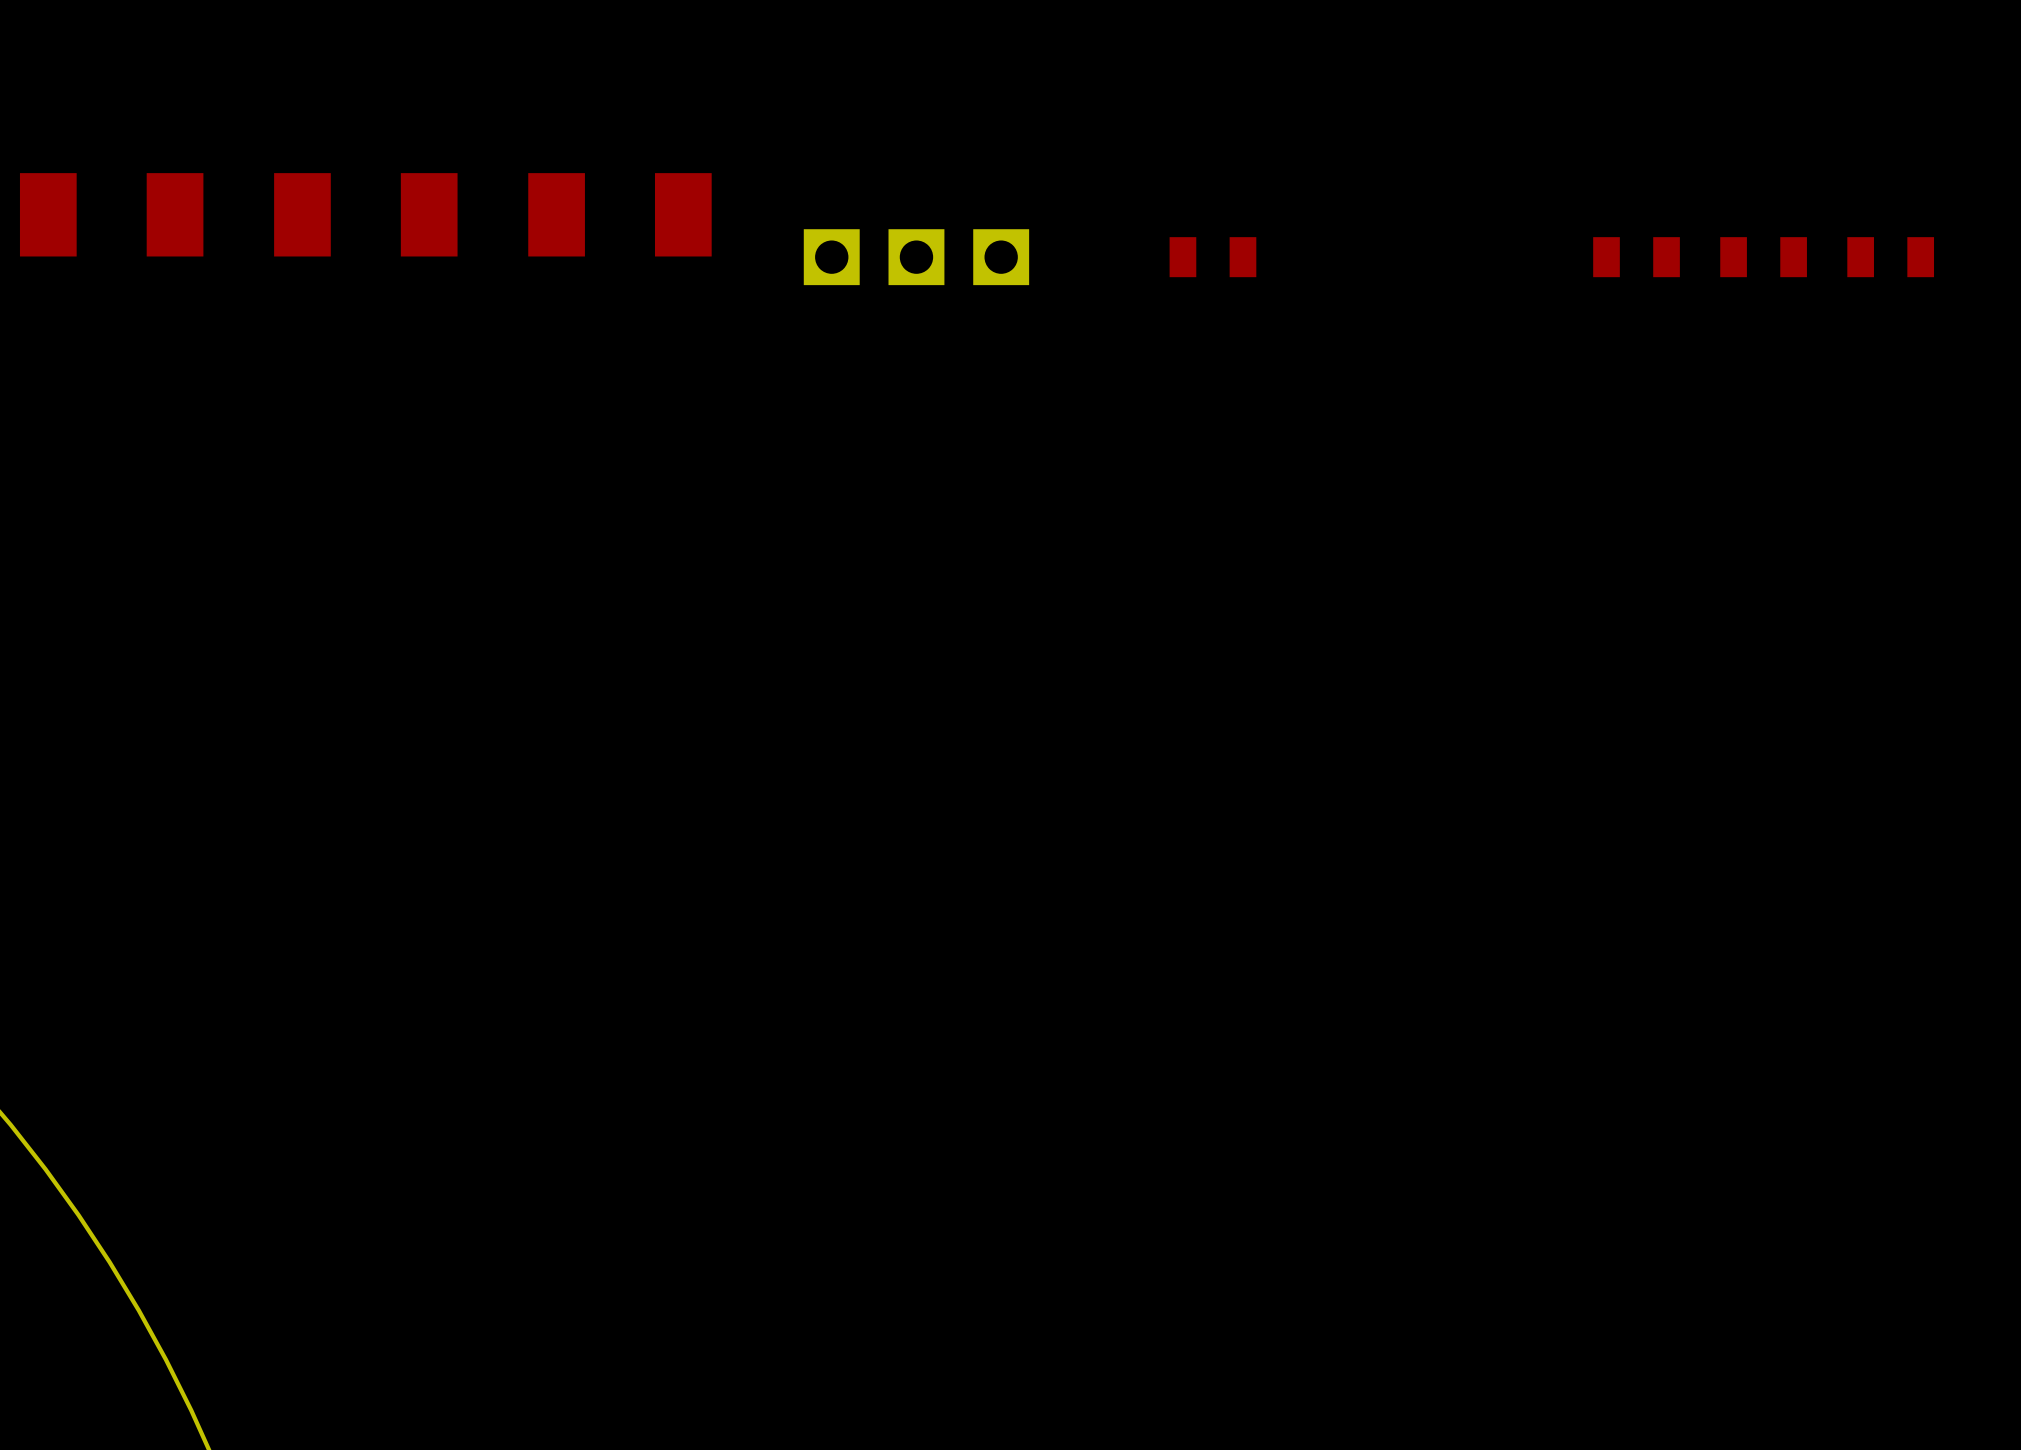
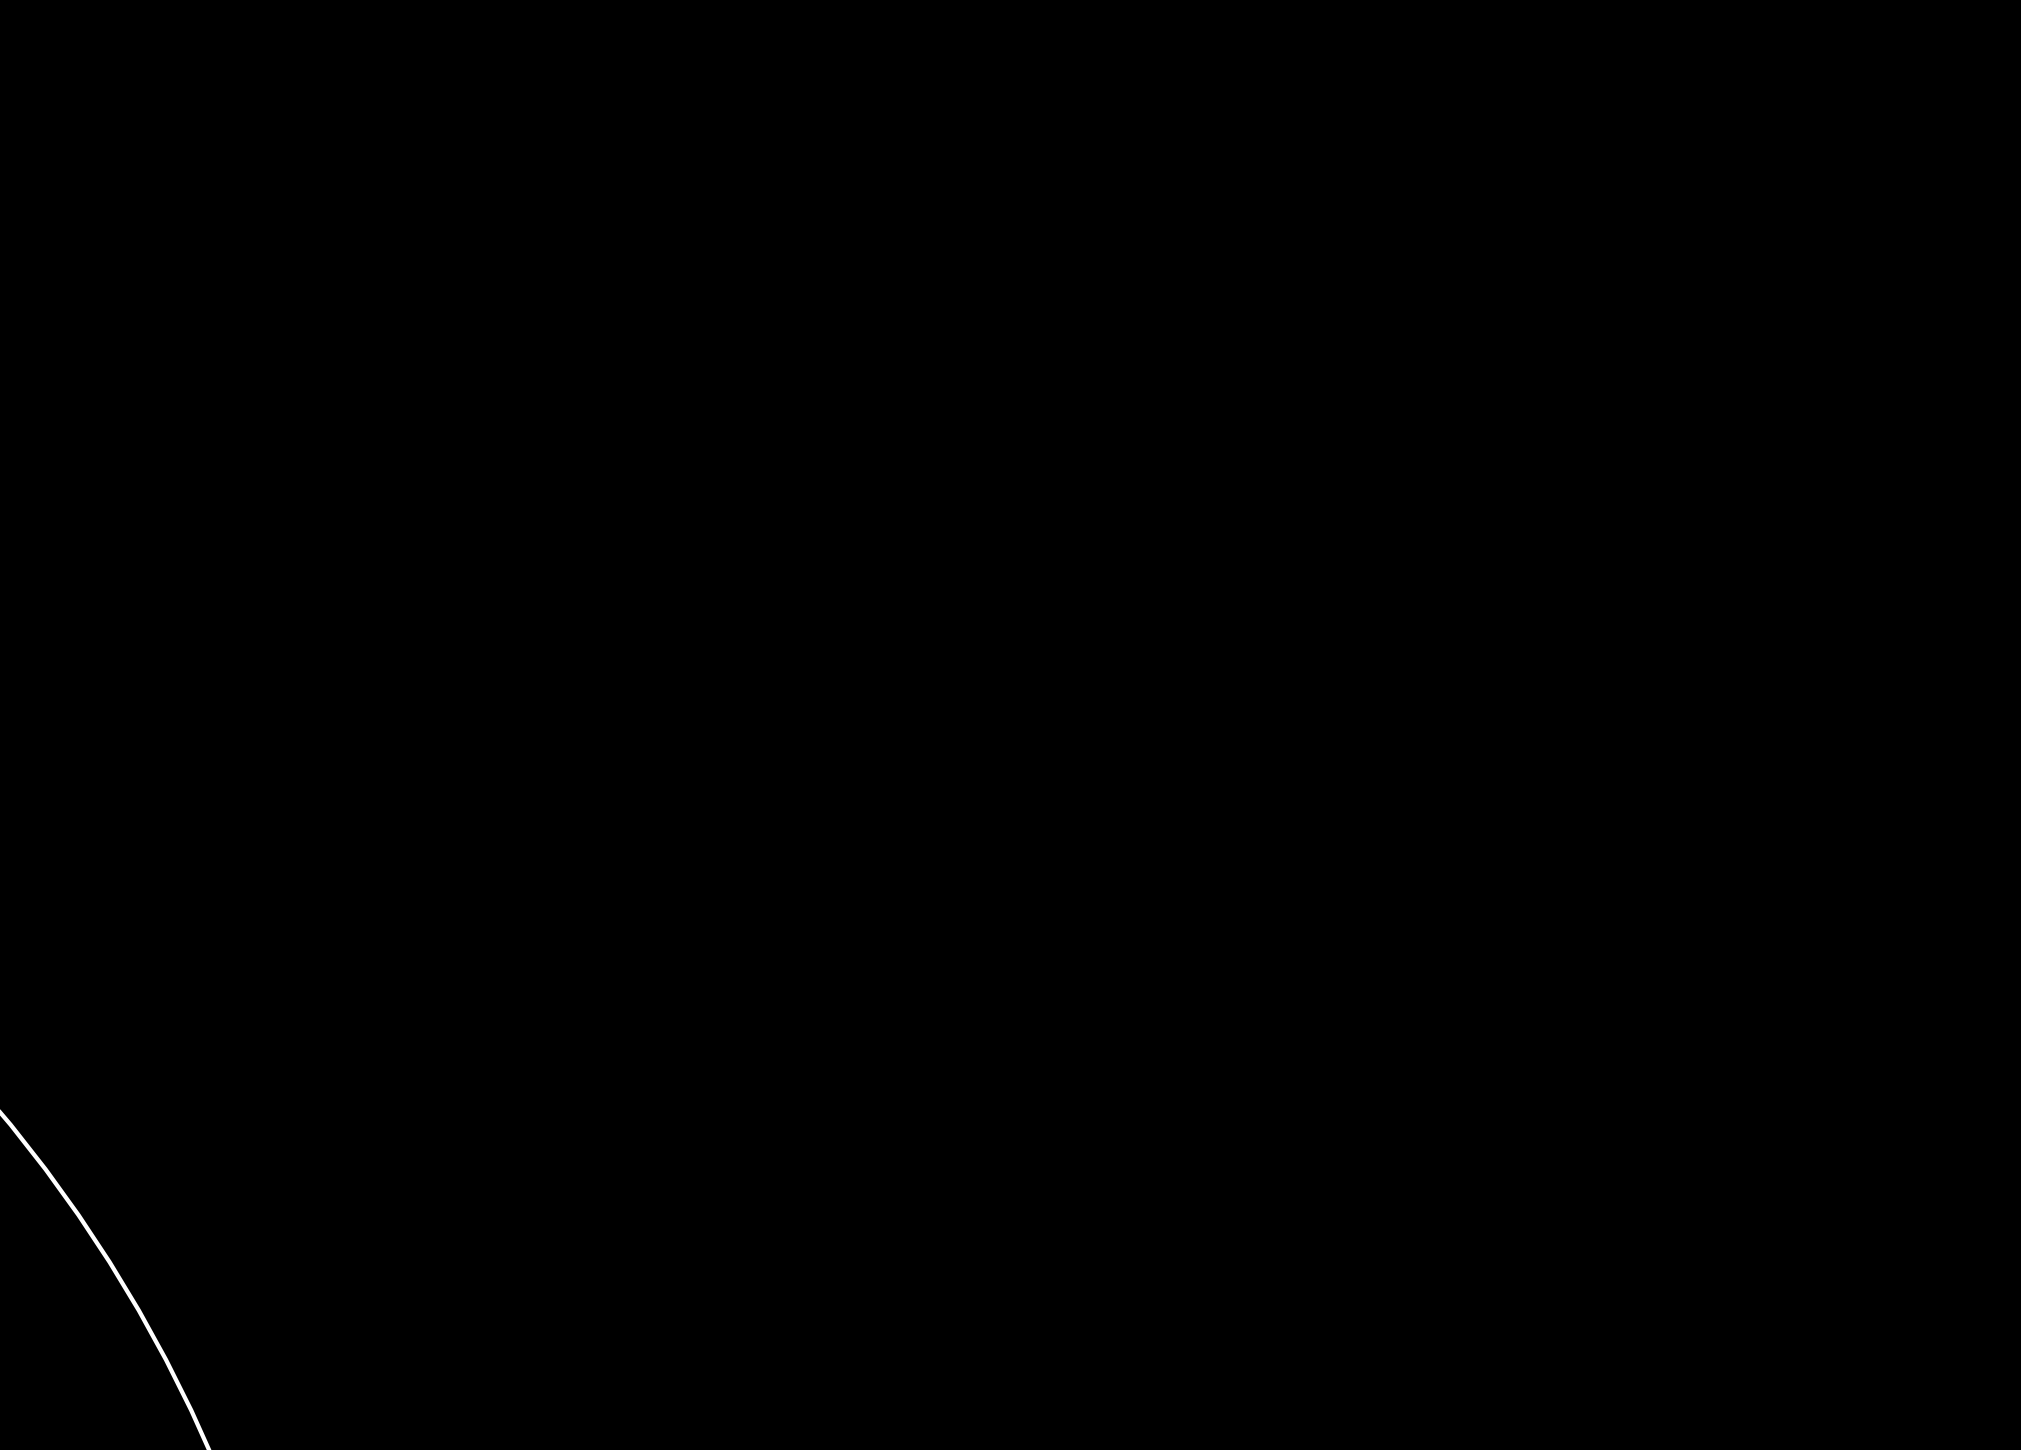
part: (111, 214) -> none
part: (365, 214) -> none
part: (619, 214) -> none
part: (916, 257) -> none
part: (1212, 257) -> none
part: (1636, 257) -> none
part: (1763, 257) -> none
part: (1890, 257) -> none

